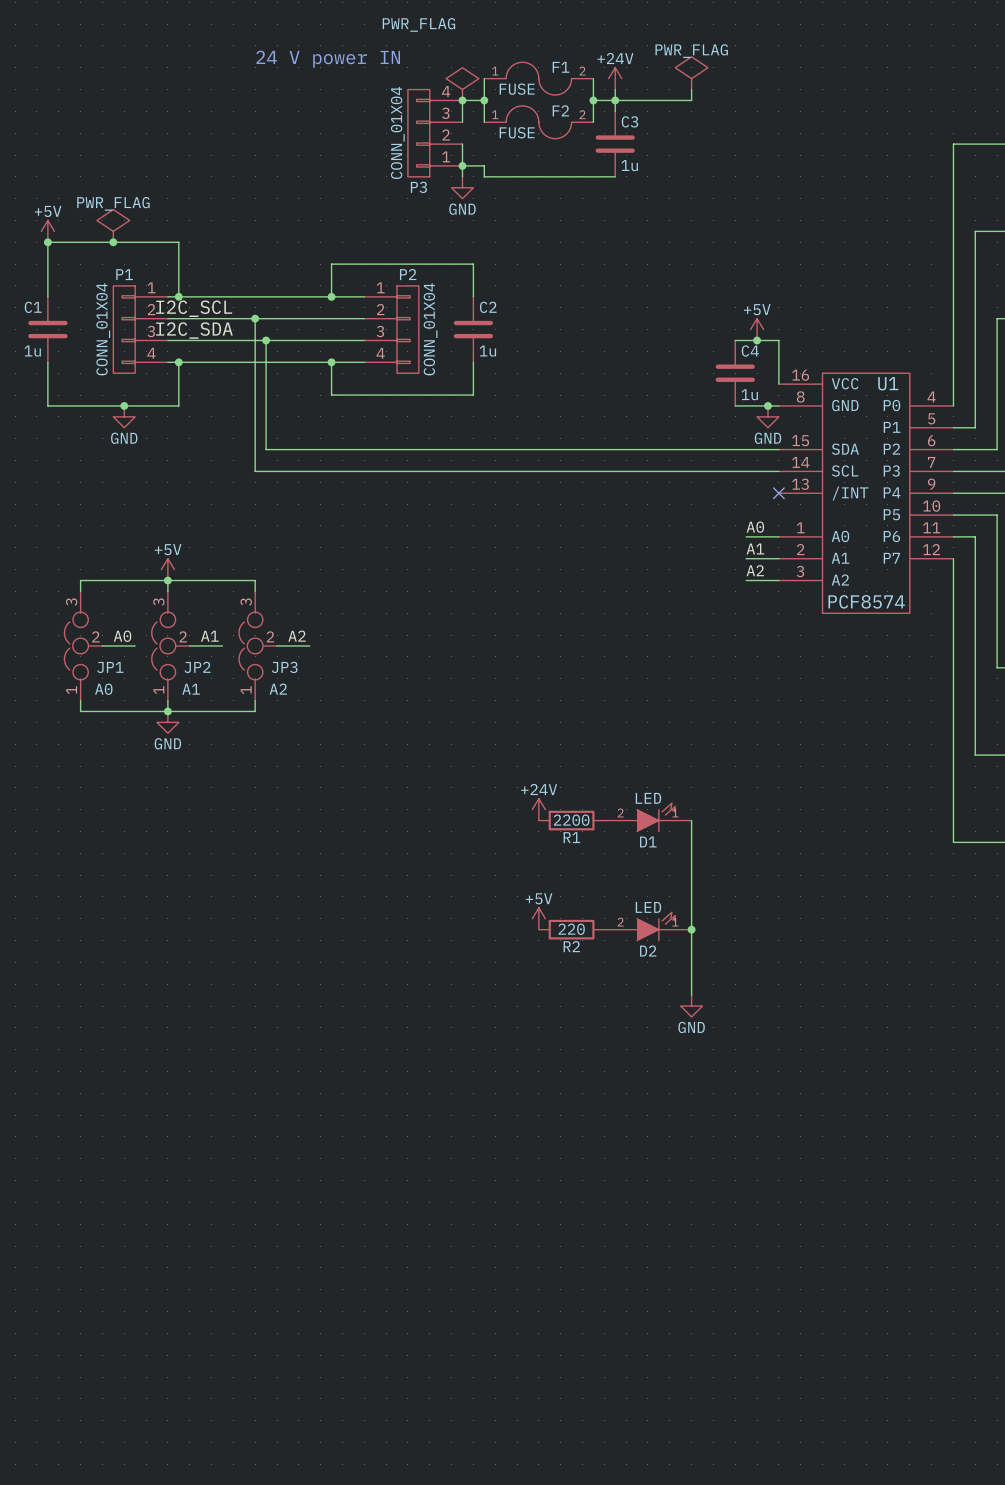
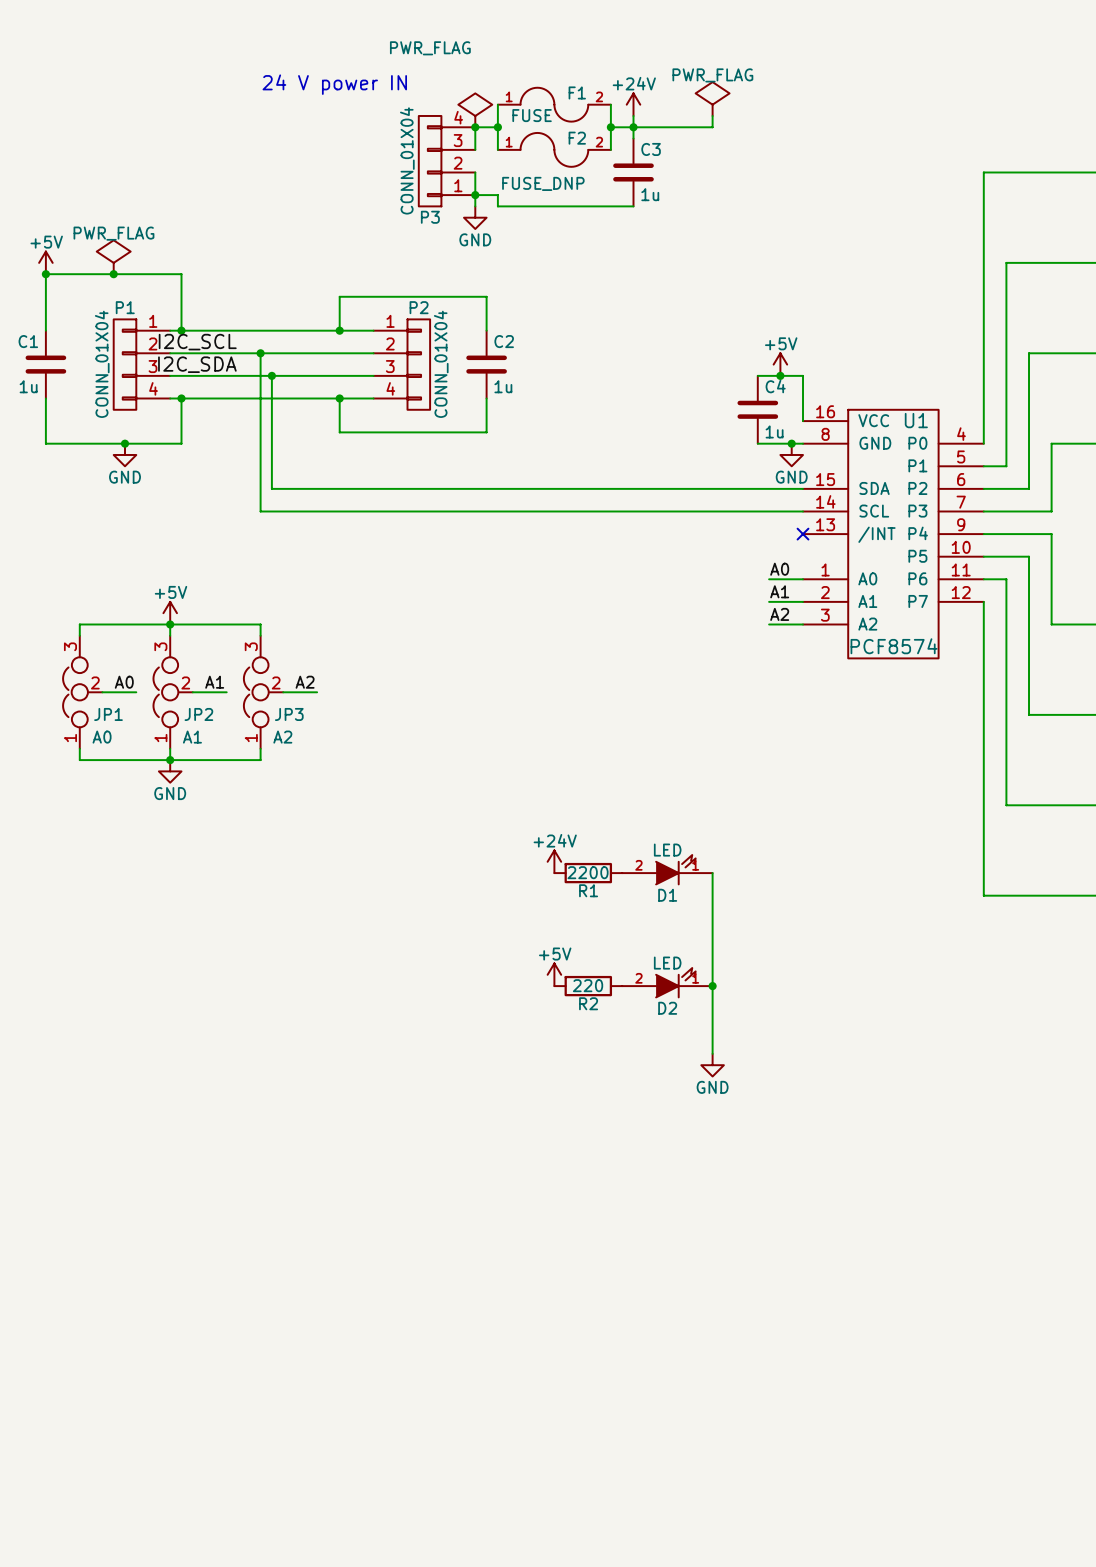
F2 value: FUSE (517, 132) -> FUSE_DNP (543, 183)

